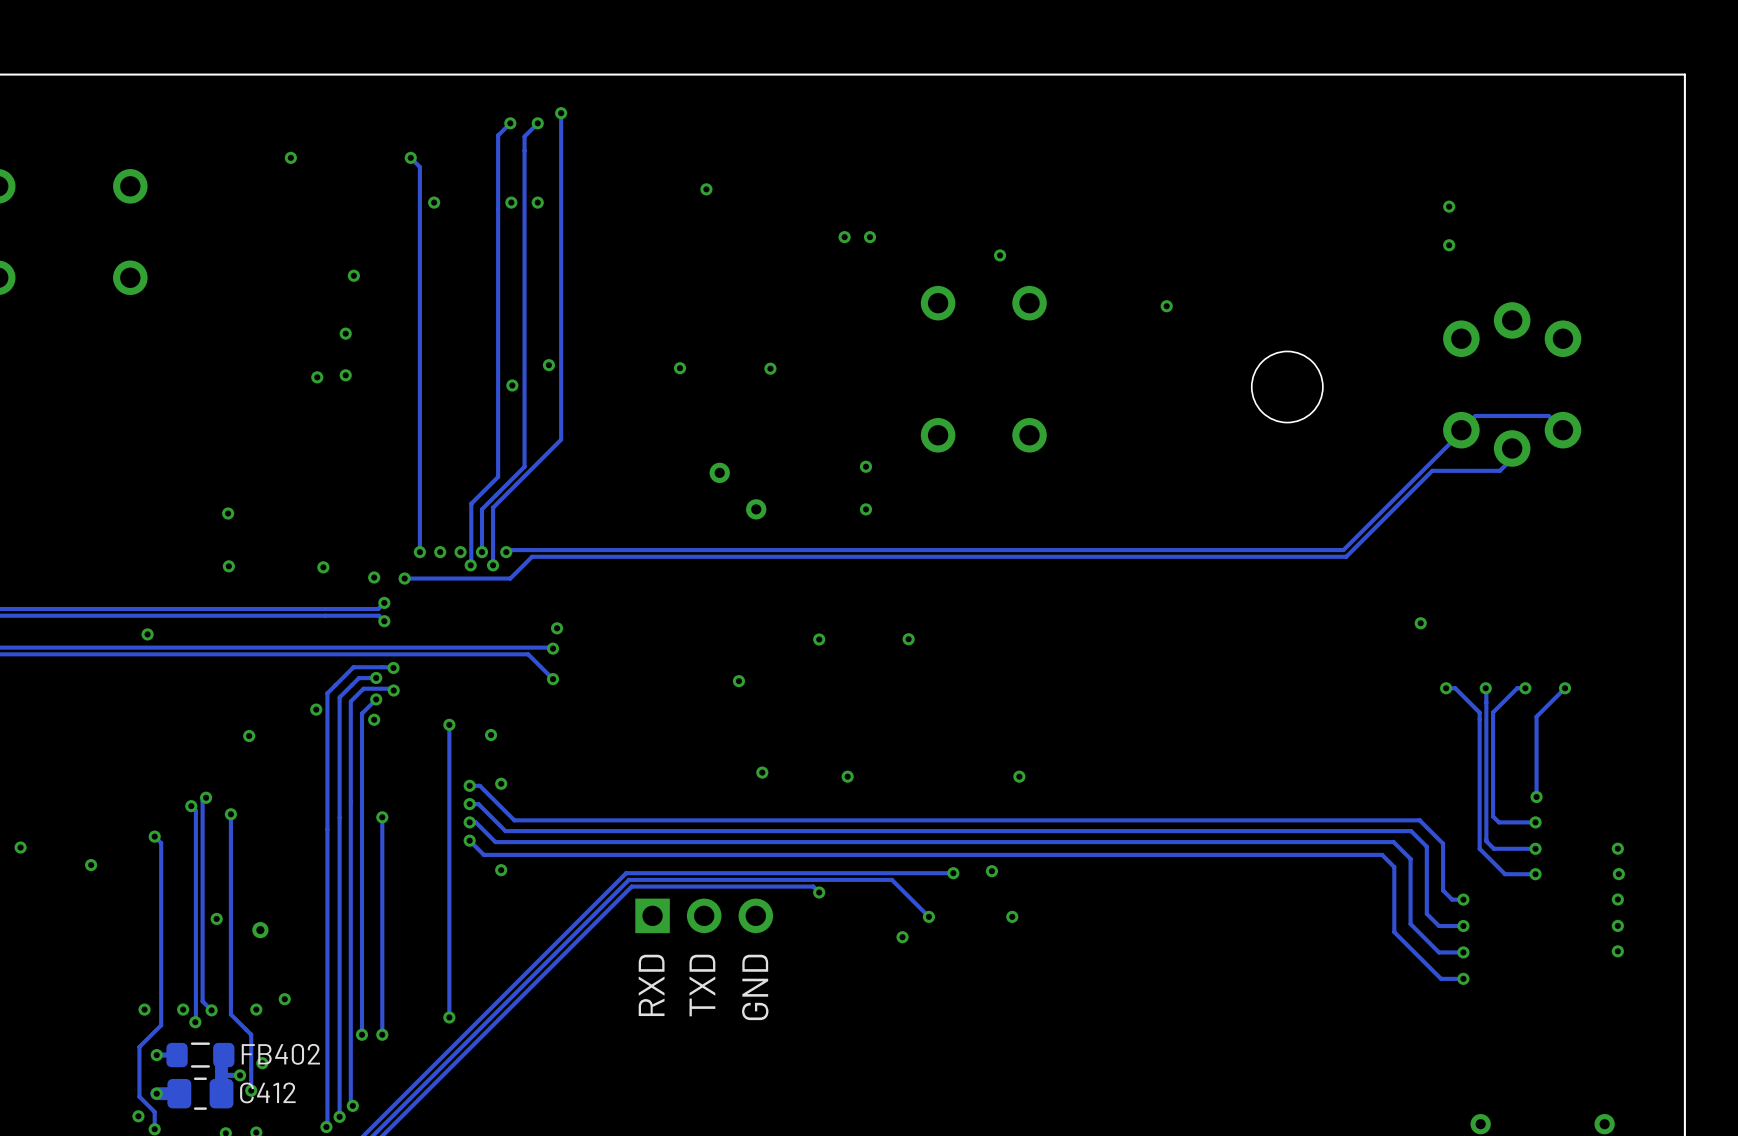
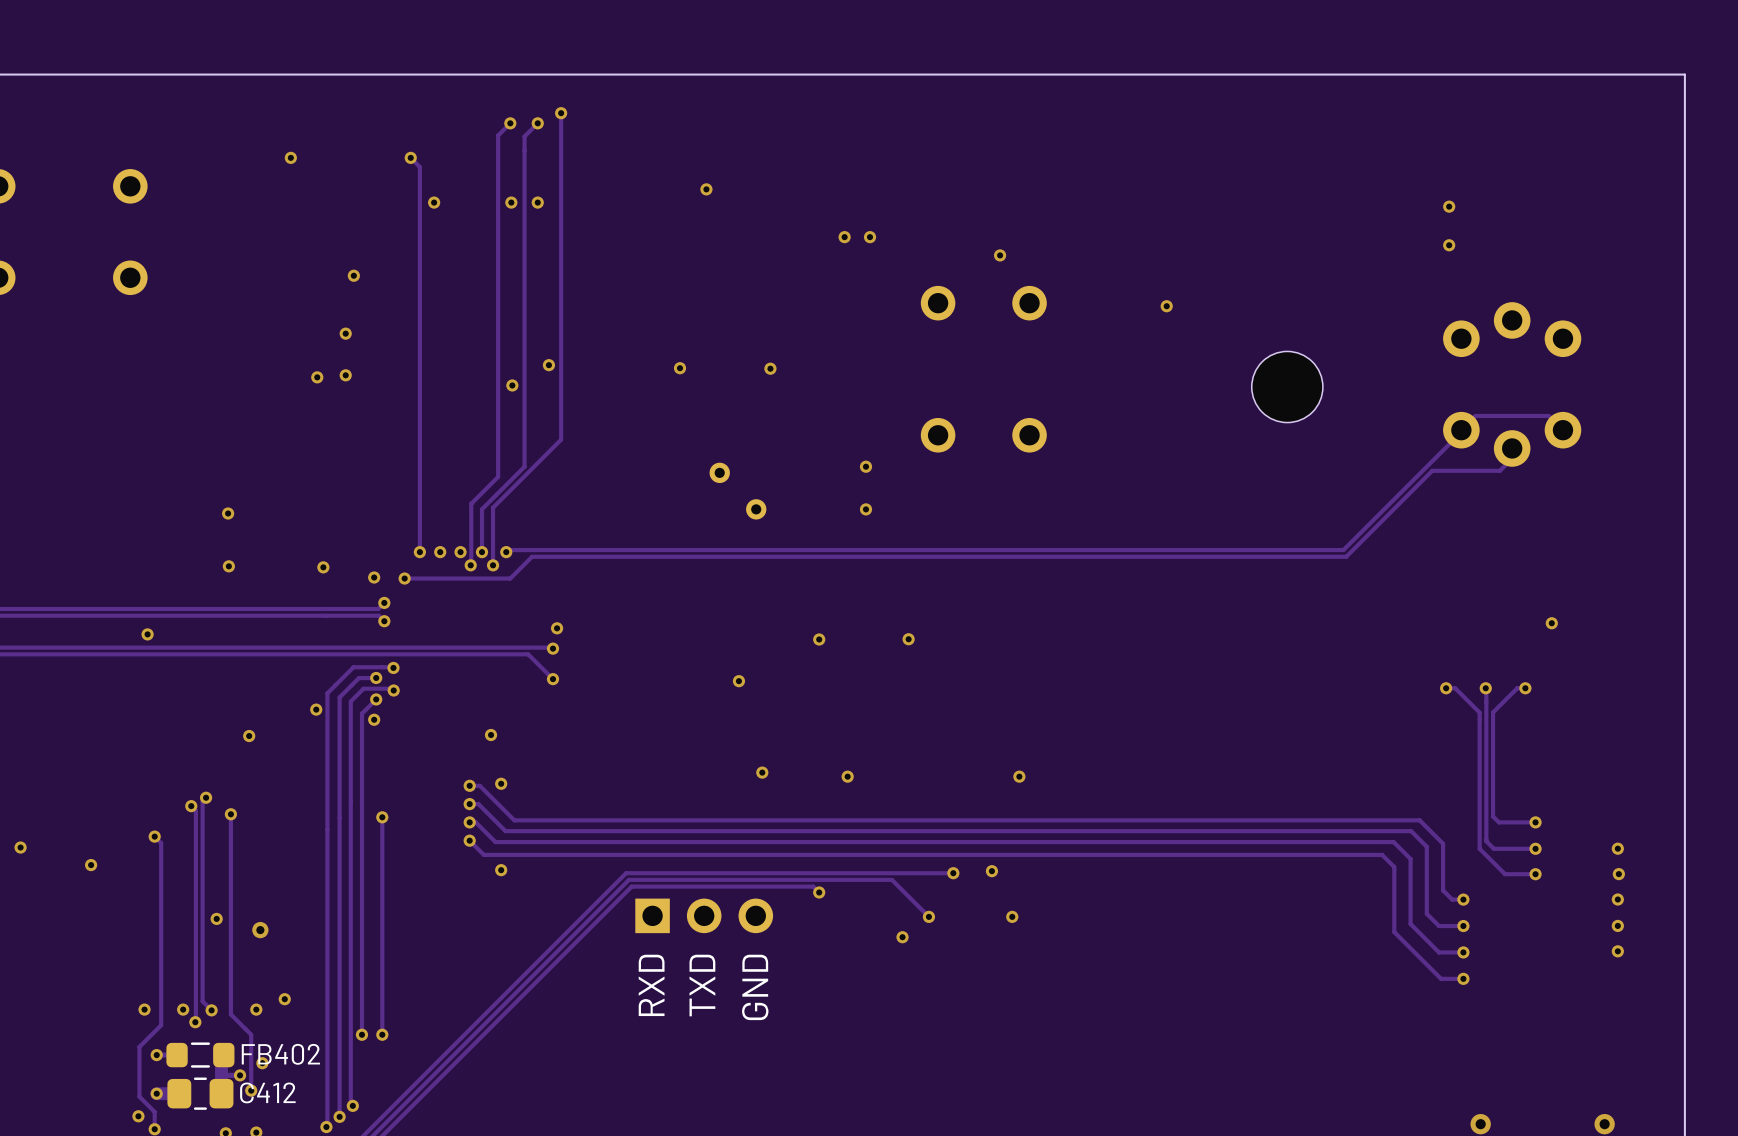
via: (1420, 623) -> none
via: none -> (1551, 623)
track: (1565, 688) (1536, 716) (1536, 796) -> none
via: (1565, 688) -> none
track: (449, 724) (449, 1017) -> none
via: (449, 724) -> none
via: (1536, 796) -> none
via: (449, 1017) -> none

